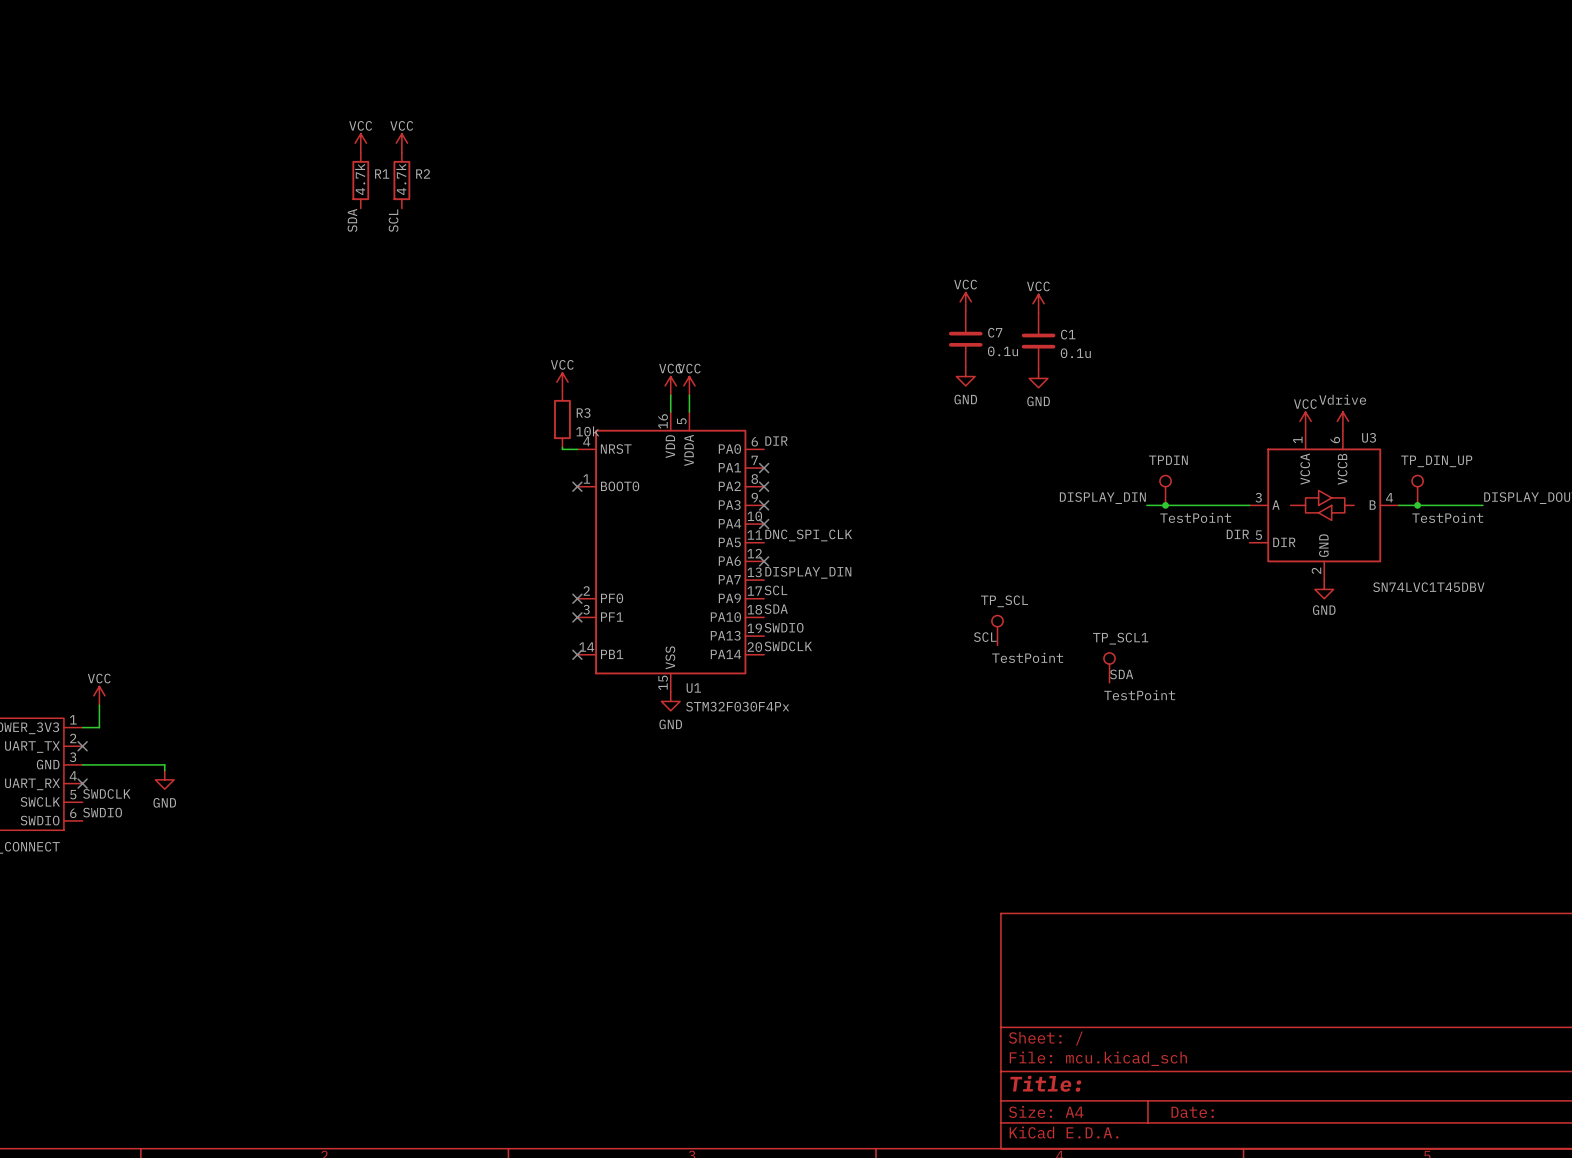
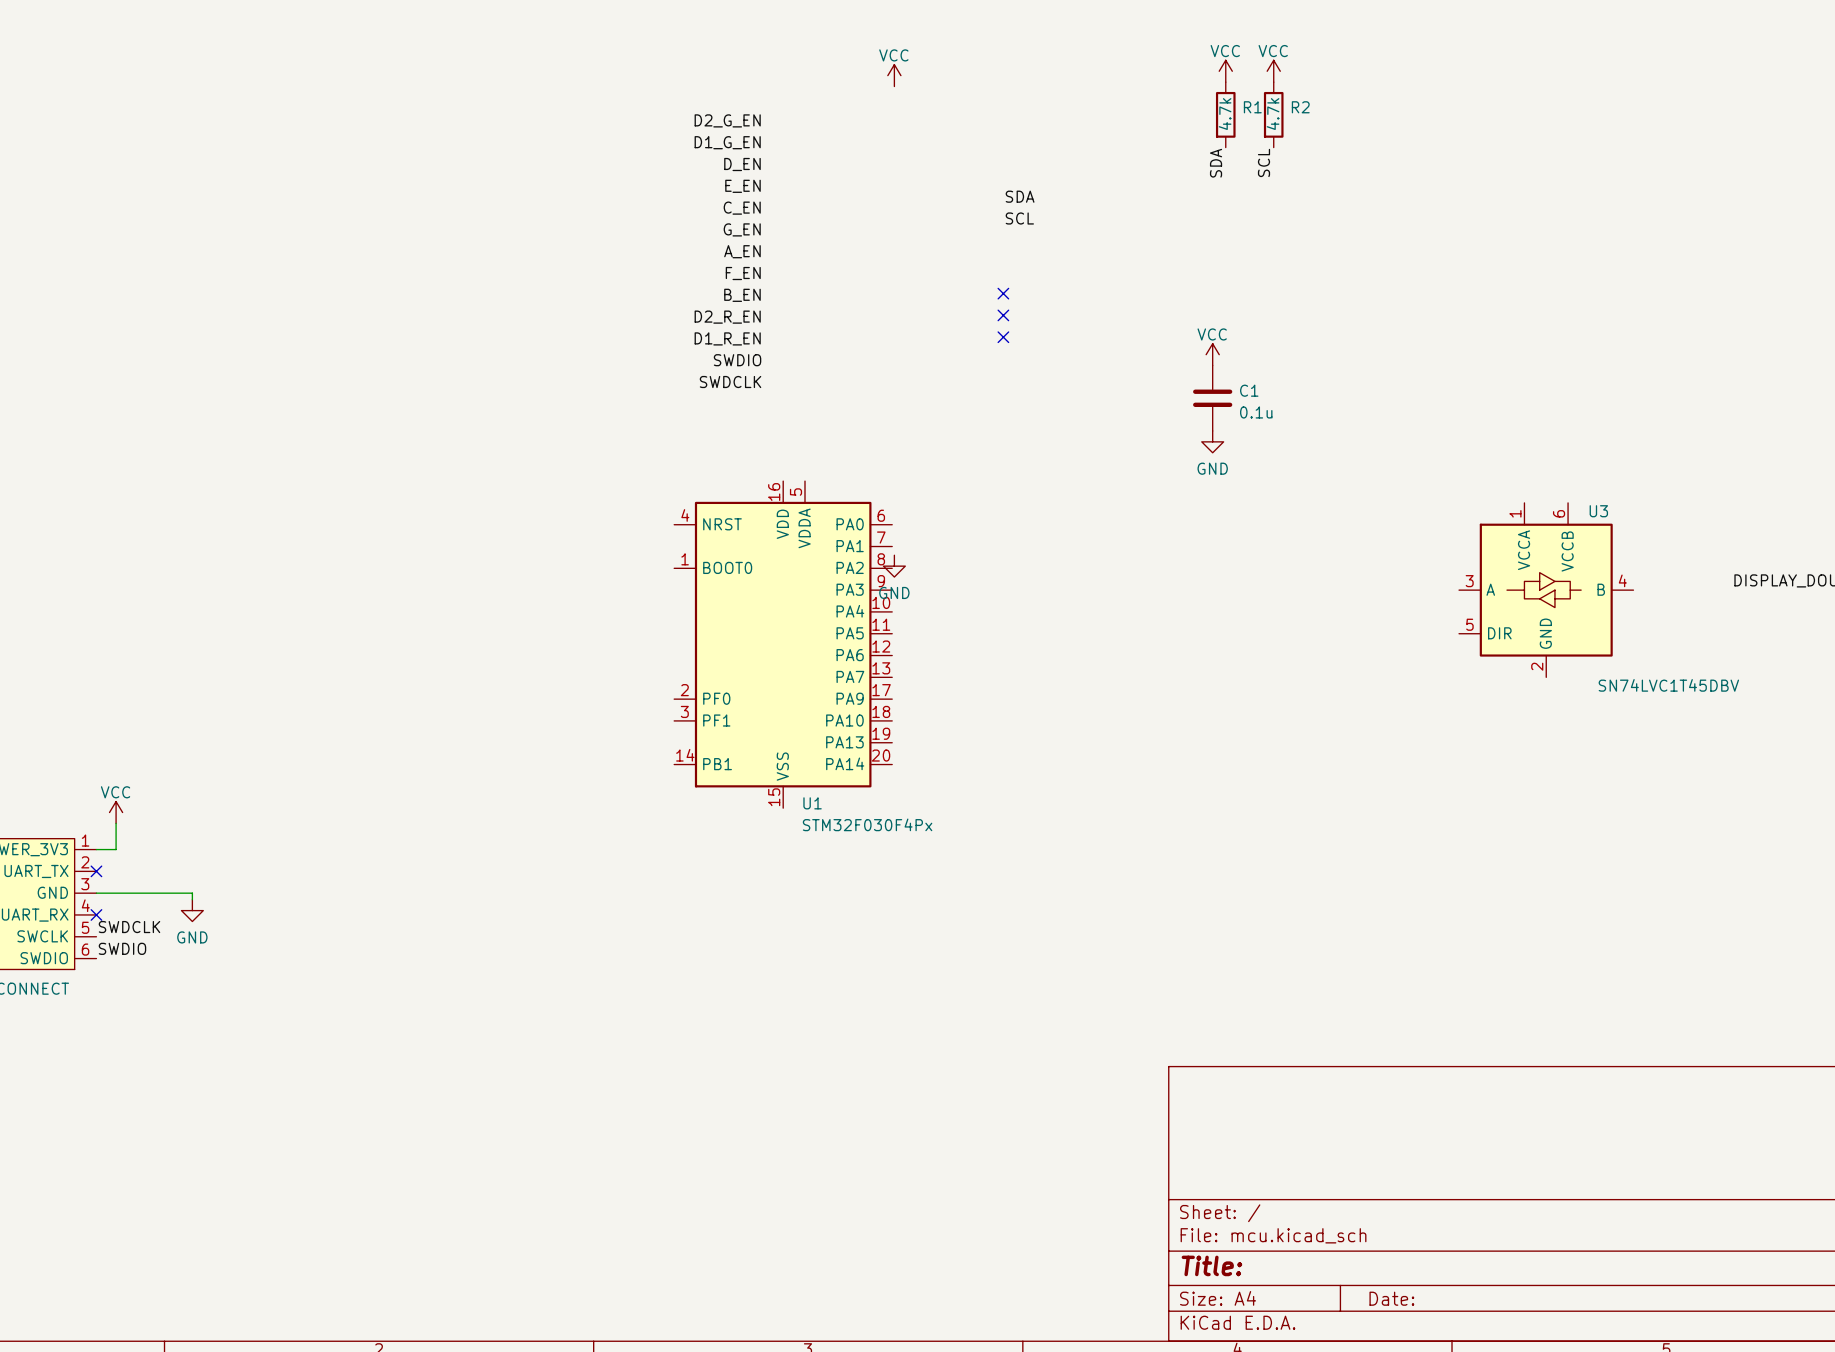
power symbol: none -> VCC (1225, 71)
power symbol: none -> VCC (1273, 71)
power symbol: none -> VCC (894, 75)
label: none -> D2_G_EN (727, 120)
label: none -> D1_G_EN (727, 142)
label: none -> SDA (1216, 163)
label: none -> SCL (1264, 162)
label: none -> D_EN (742, 164)
power symbol: VCC (360, 143) -> none
power symbol: VCC (401, 143) -> none
label: none -> E_EN (742, 186)
label: none -> SDA (1020, 196)
label: none -> C_EN (742, 208)
R1 position: (360, 180) -> (1225, 114)
R2 position: (401, 180) -> (1273, 114)
label: none -> SCL (1019, 218)
label: none -> G_EN (742, 229)
label: none -> A_EN (742, 251)
label: SDA (352, 220) -> none
label: SCL (393, 220) -> none
label: none -> F_EN (743, 273)
no-connect mark: none -> (1003, 293)
label: none -> B_EN (742, 295)
no-connect mark: none -> (1003, 315)
label: none -> D2_R_EN (727, 317)
no-connect mark: none -> (1003, 337)
label: none -> D1_R_EN (727, 338)
power symbol: VCC (965, 301) -> none
label: none -> SWDIO (737, 360)
label: none -> SWDCLK (730, 382)
C7: 0.1u (965, 339) -> none
power symbol: GND (965, 376) -> none
power symbol: VCC (562, 382) -> none
power symbol: VCC (670, 385) -> none
power symbol: VCC (689, 385) -> none
wire: (670, 395) (670, 412) -> none
wire: (689, 395) (689, 412) -> none
R3: 10k (562, 419) -> none
power symbol: VCC (1305, 421) -> none
power symbol: Vdrive (1342, 421) -> none
label: DIR (776, 441) -> none
wire: (562, 447) (562, 449) (577, 449) -> none
no-connect mark: (764, 468) -> none
power symbol: none -> GND (894, 566)
no-connect mark: (577, 486) -> none
no-connect mark: (764, 486) -> none
TPDIN: TestPoint (1165, 490) -> none
TP_DIN_UP: TestPoint (1417, 490) -> none
label: DISPLAY_DIN (1102, 498) -> none
no-connect mark: (764, 505) -> none
wire: (1146, 505) (1249, 505) -> none
junction: (1165, 505) -> none
wire: (1398, 505) (1482, 505) -> none
junction: (1417, 505) -> none
no-connect mark: (764, 524) -> none
label: DIR (1237, 534) -> none
label: DNC_SPI_CLK (808, 535) -> none
no-connect mark: (764, 561) -> none
label: DISPLAY_DIN (808, 572) -> none
power symbol: GND (1324, 589) -> none
label: SCL (776, 590) -> none
no-connect mark: (577, 598) -> none
label: SDA (776, 609) -> none
no-connect mark: (577, 617) -> none
label: SWDIO (784, 627) -> none
TP_SCL: TestPoint (997, 630) -> none
label: SCL (985, 637) -> none
label: SWDCLK (788, 646) -> none
no-connect mark: (577, 654) -> none
TP_SCL1: TestPoint (1109, 667) -> none
label: SDA (1121, 674) -> none
power symbol: GND (670, 701) -> none

